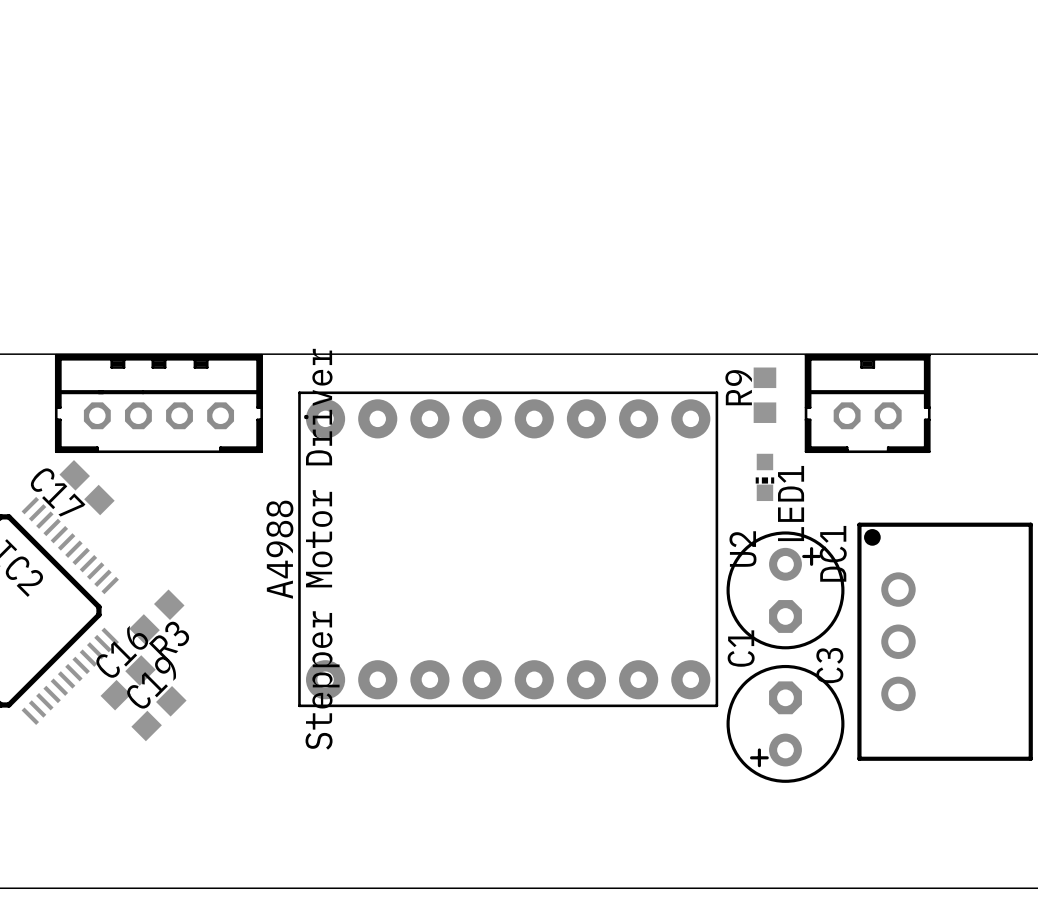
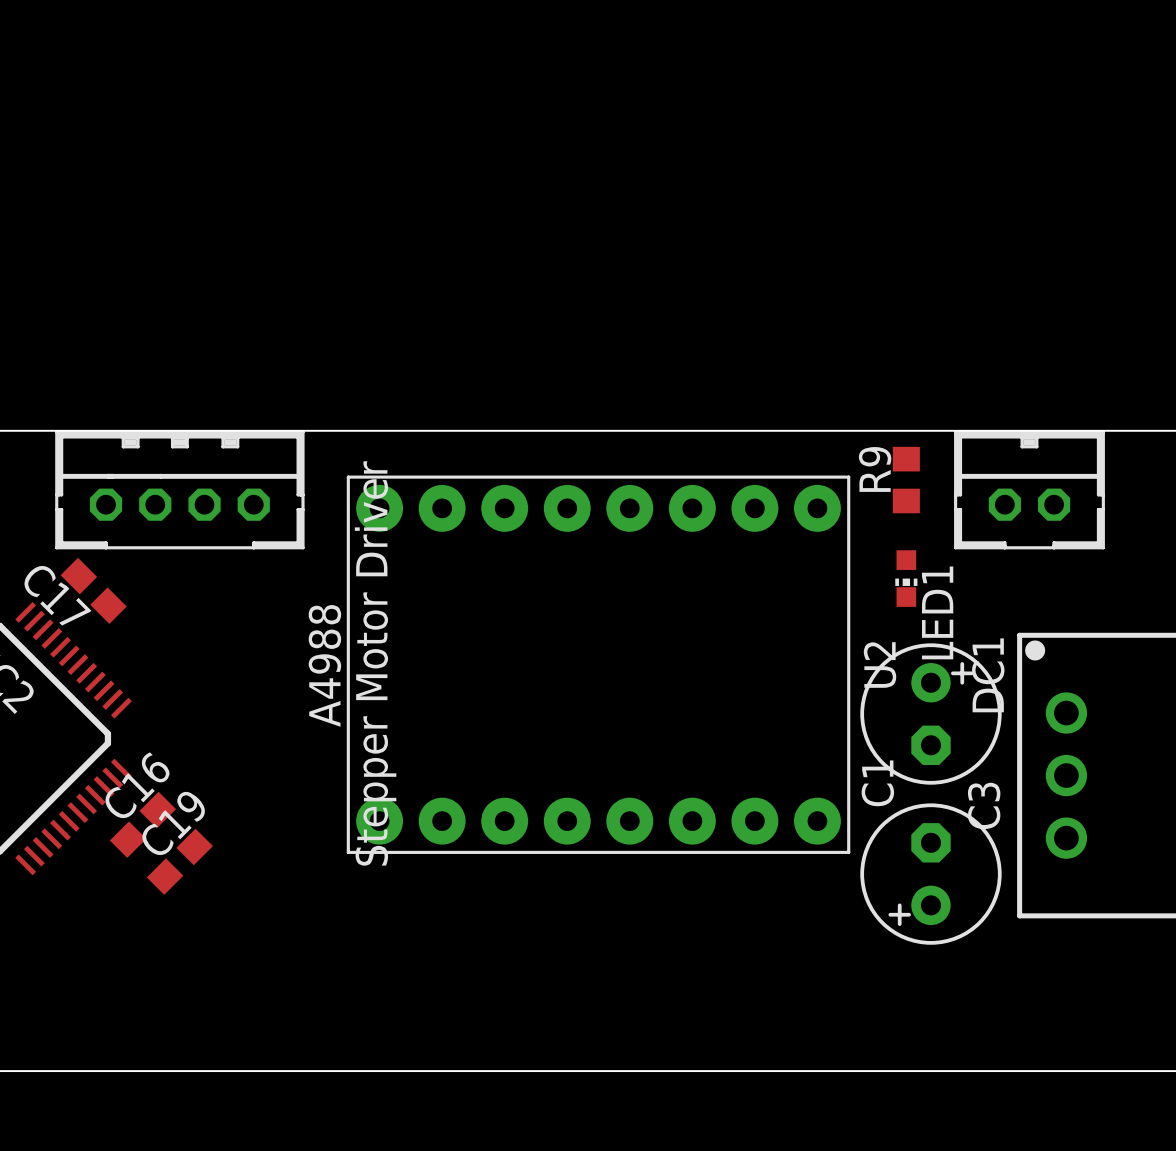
R3: (156, 617) -> none

